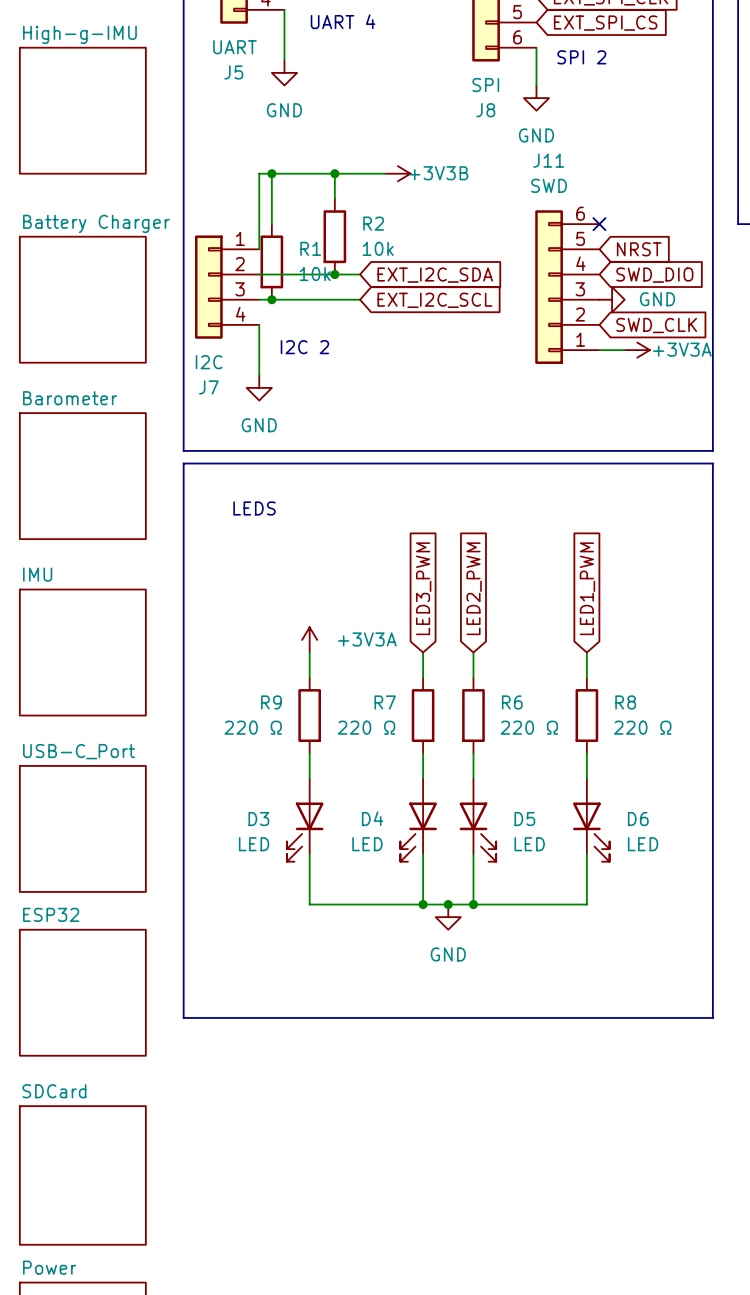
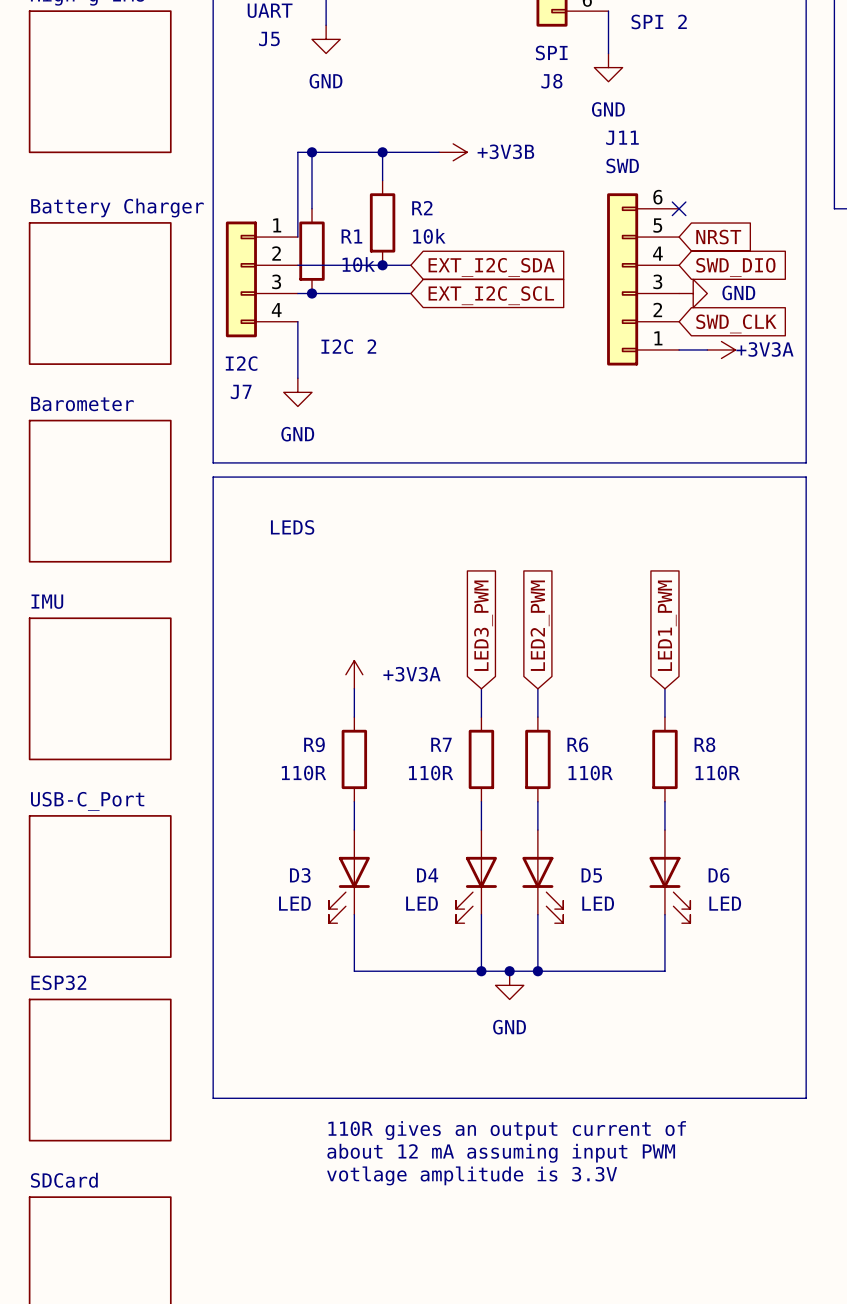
R9 value: 220 Ω (253, 727) -> 110R (303, 773)
R7 value: 220 Ω (366, 727) -> 110R (431, 773)
R6 value: 220 Ω (529, 727) -> 110R (590, 773)
R8 value: 220 Ω (642, 727) -> 110R (717, 773)
text: none -> 110R gives an output current of (507, 1130)
text: none -> about 12 mA assuming input PWM (501, 1153)
text: none -> votlage amplitude is 3.3V (472, 1175)

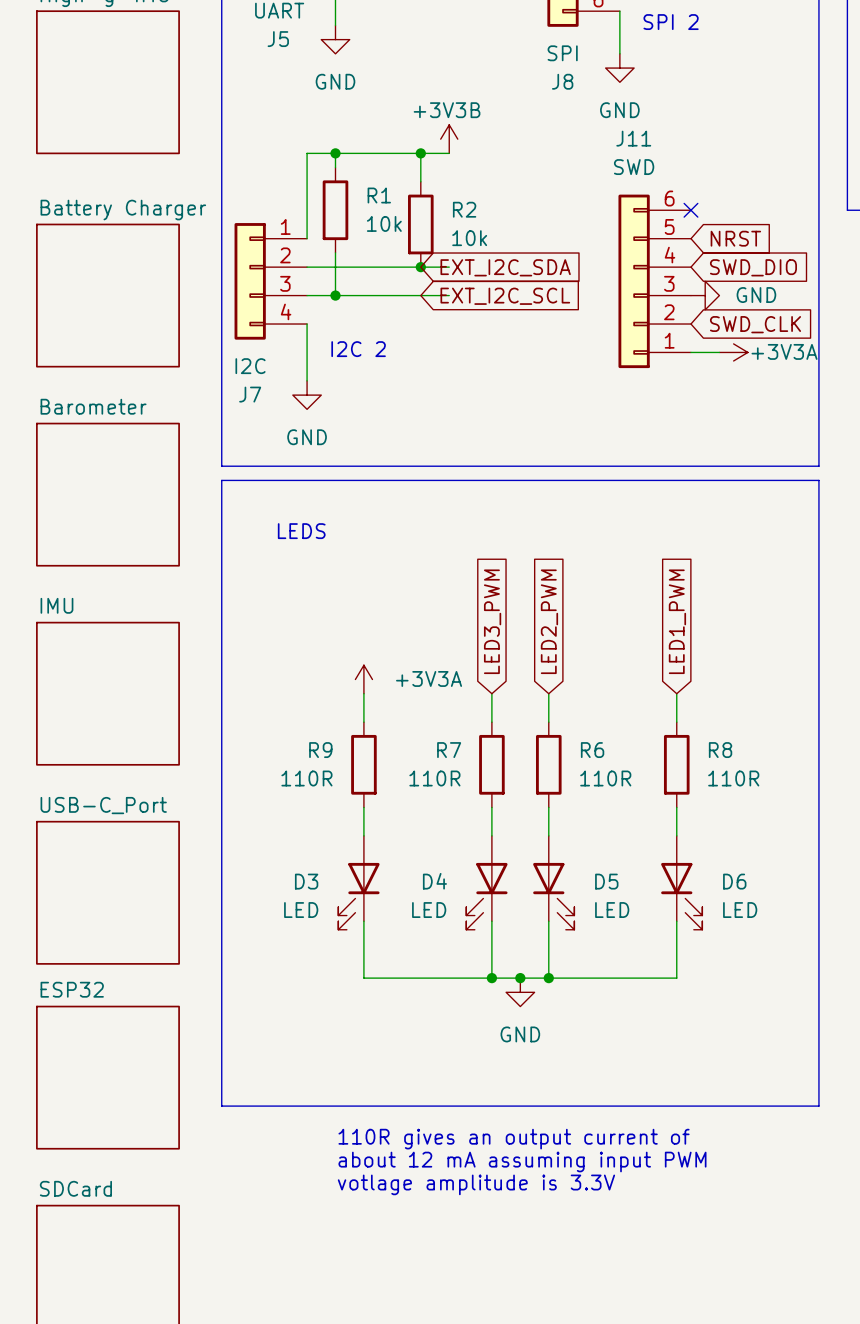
wire: (311, 152) (311, 208) -> none
junction position: (311, 152) -> (335, 153)
wire: none -> (335, 153) (335, 167)
wire: (382, 152) (382, 180) -> (420, 153) (420, 181)
junction: (382, 152) -> none
junction: none -> (420, 153)
power symbol rotation: 0° (453, 152) -> 90° counterclockwise (449, 139)
power symbol position: +3V3B (453, 152) -> +3V3B (449, 139)
R2 position: (382, 222) -> (420, 224)
R1 position: (311, 251) -> (335, 210)
wire: none -> (335, 252) (335, 295)
junction position: (382, 265) -> (420, 267)
wire: none -> (420, 267) (449, 267)
junction position: (311, 293) -> (335, 295)
wire: none -> (420, 295) (449, 295)

